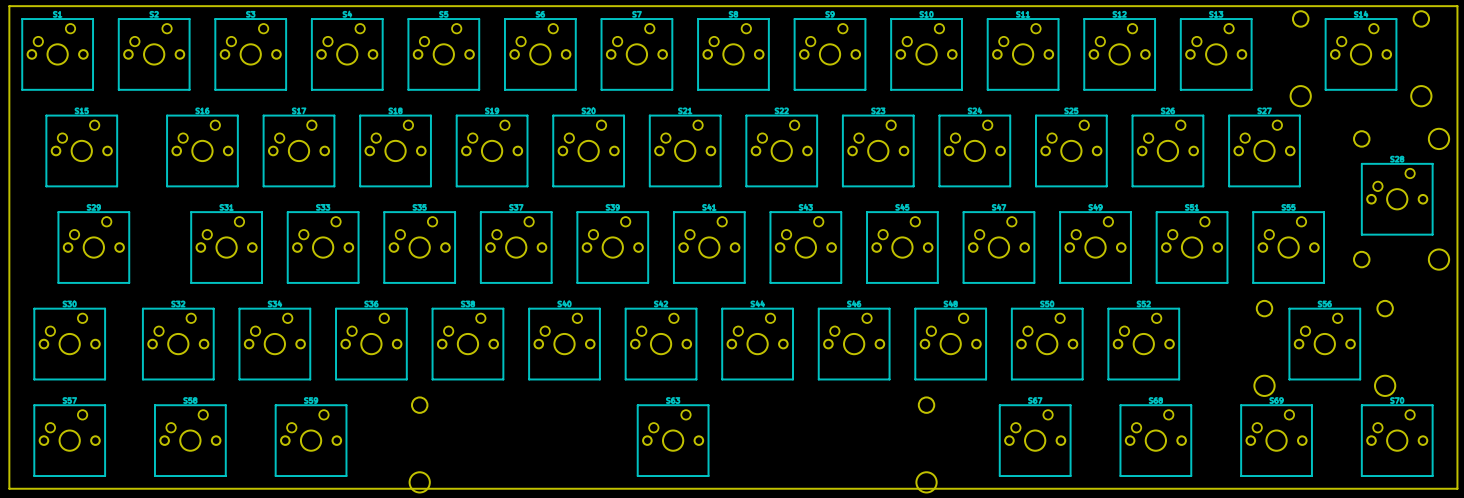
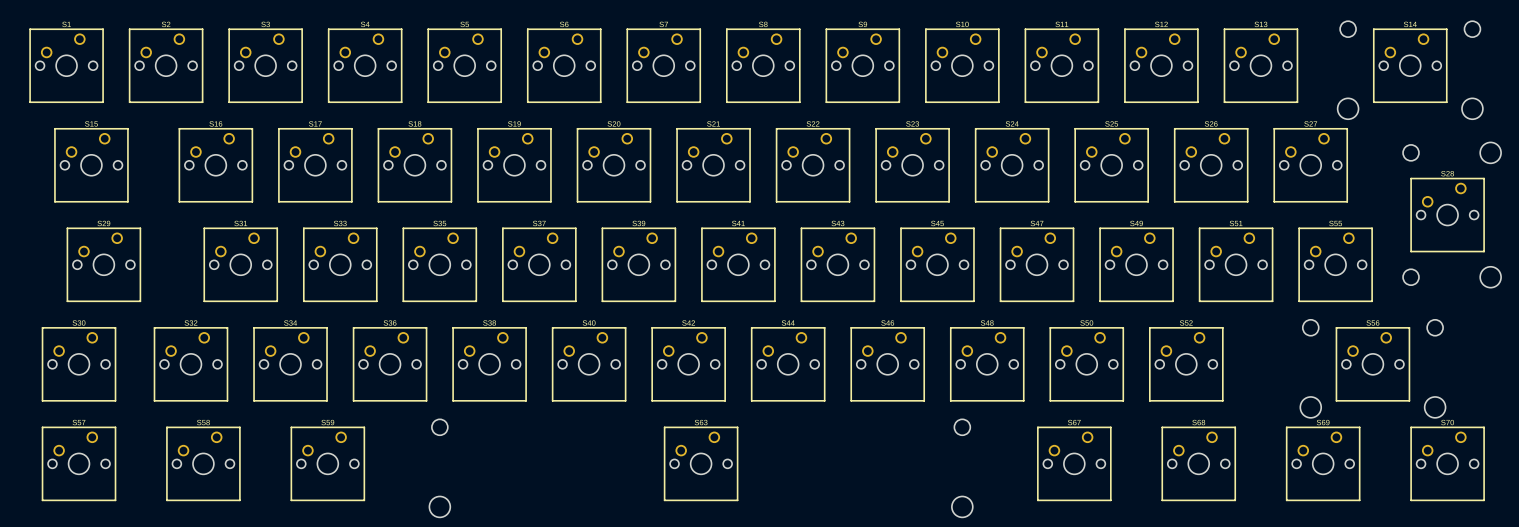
board edge: (9, 6) (1457, 6) (1457, 488) (9, 488) (9, 6) -> none

